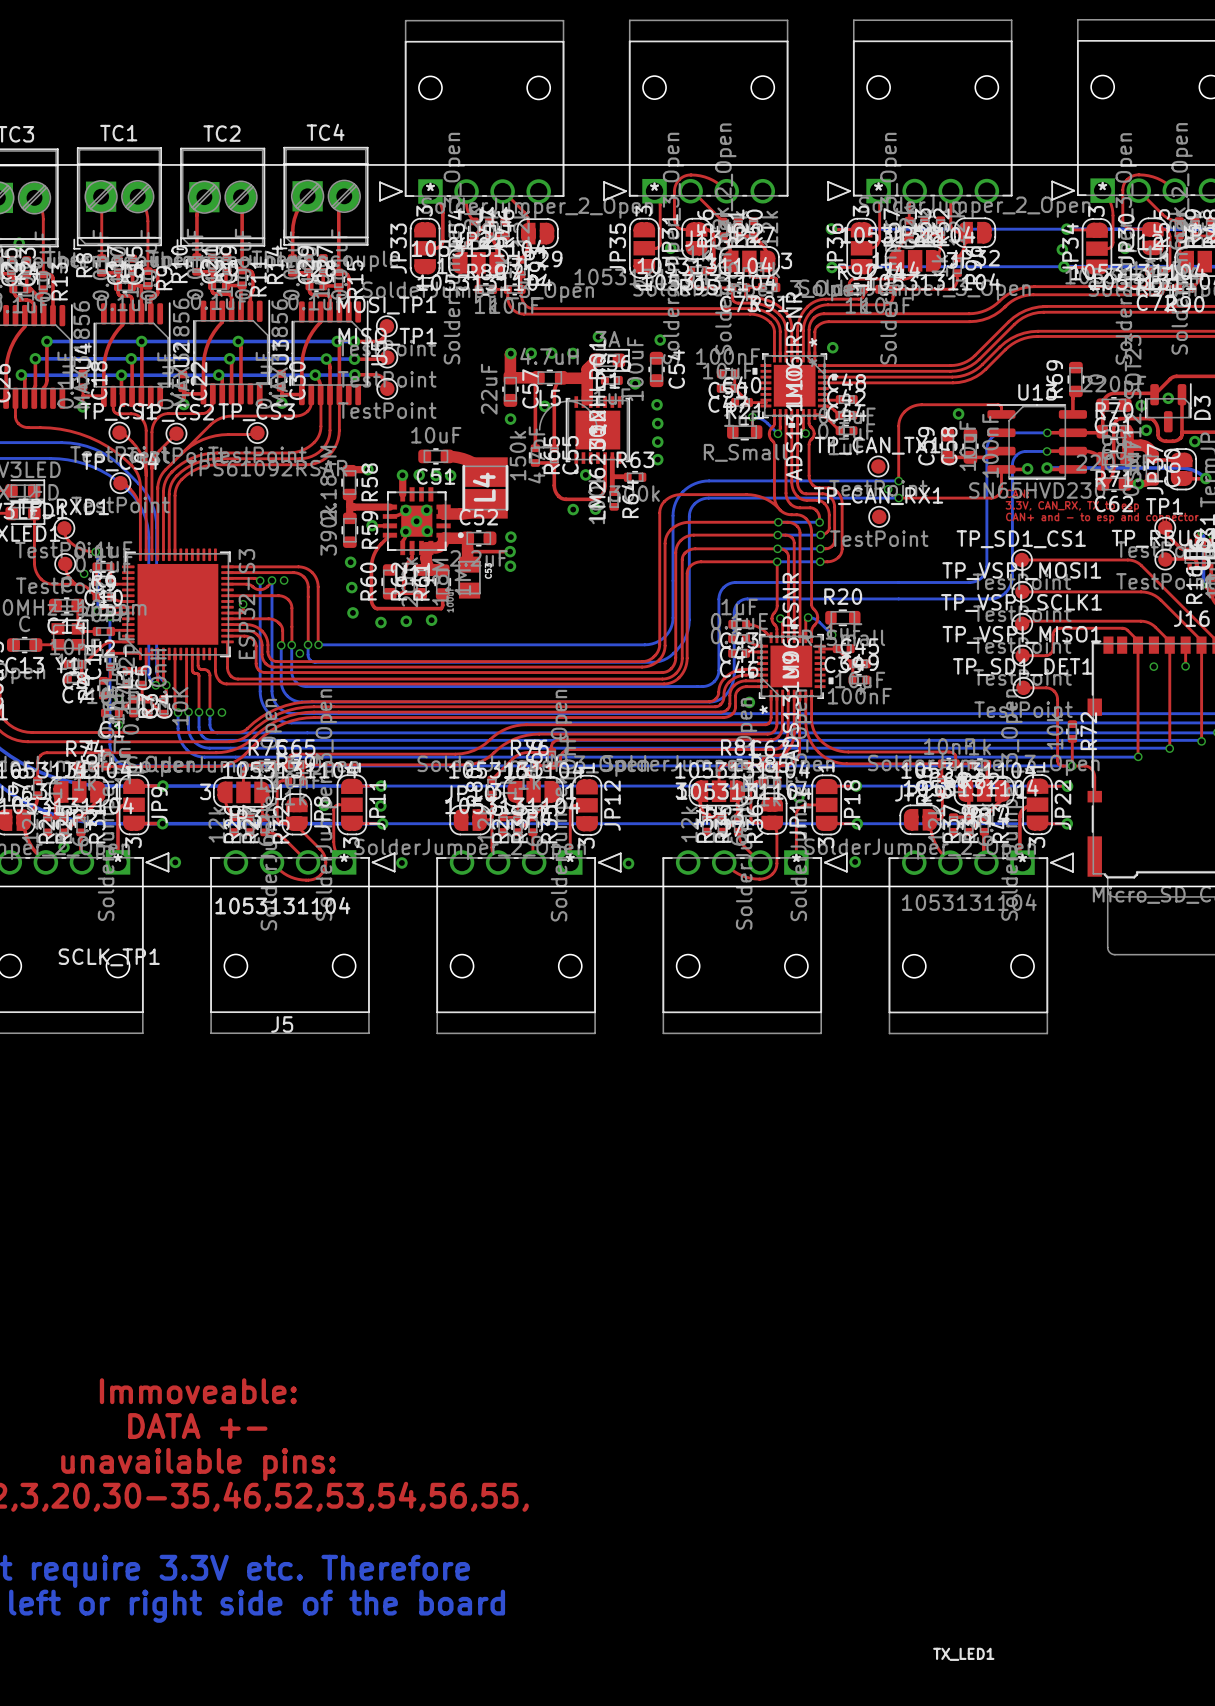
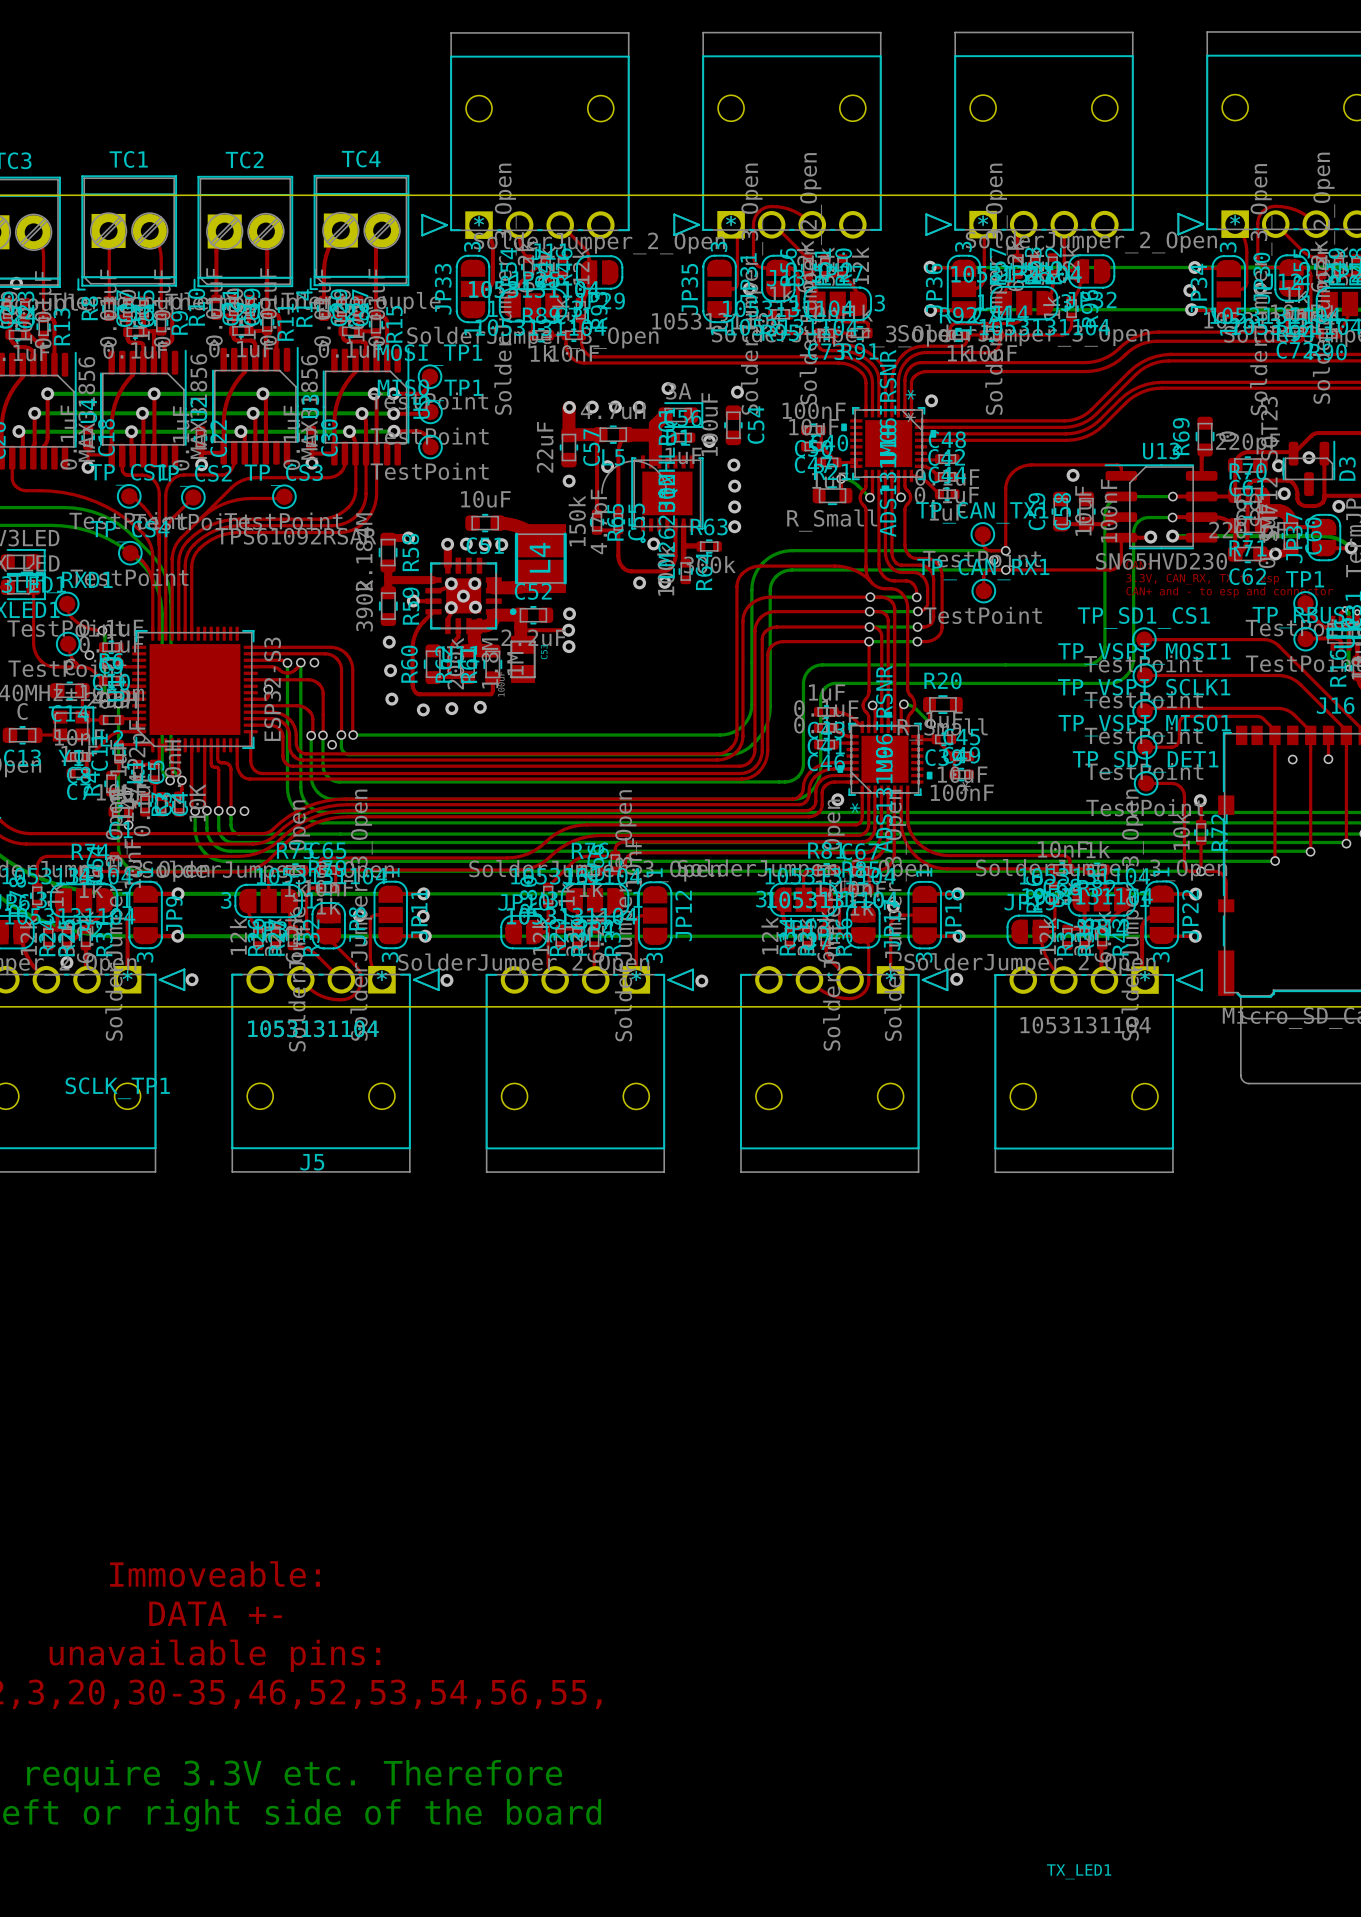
top track: none -> (982, 534) (983, 544) (986, 549) (1005, 550)
top track: none -> (1005, 569) (990, 570) (986, 572) (983, 576) (983, 591)
top track: none -> (1200, 800) (1201, 824)
via: none -> (1200, 800)

